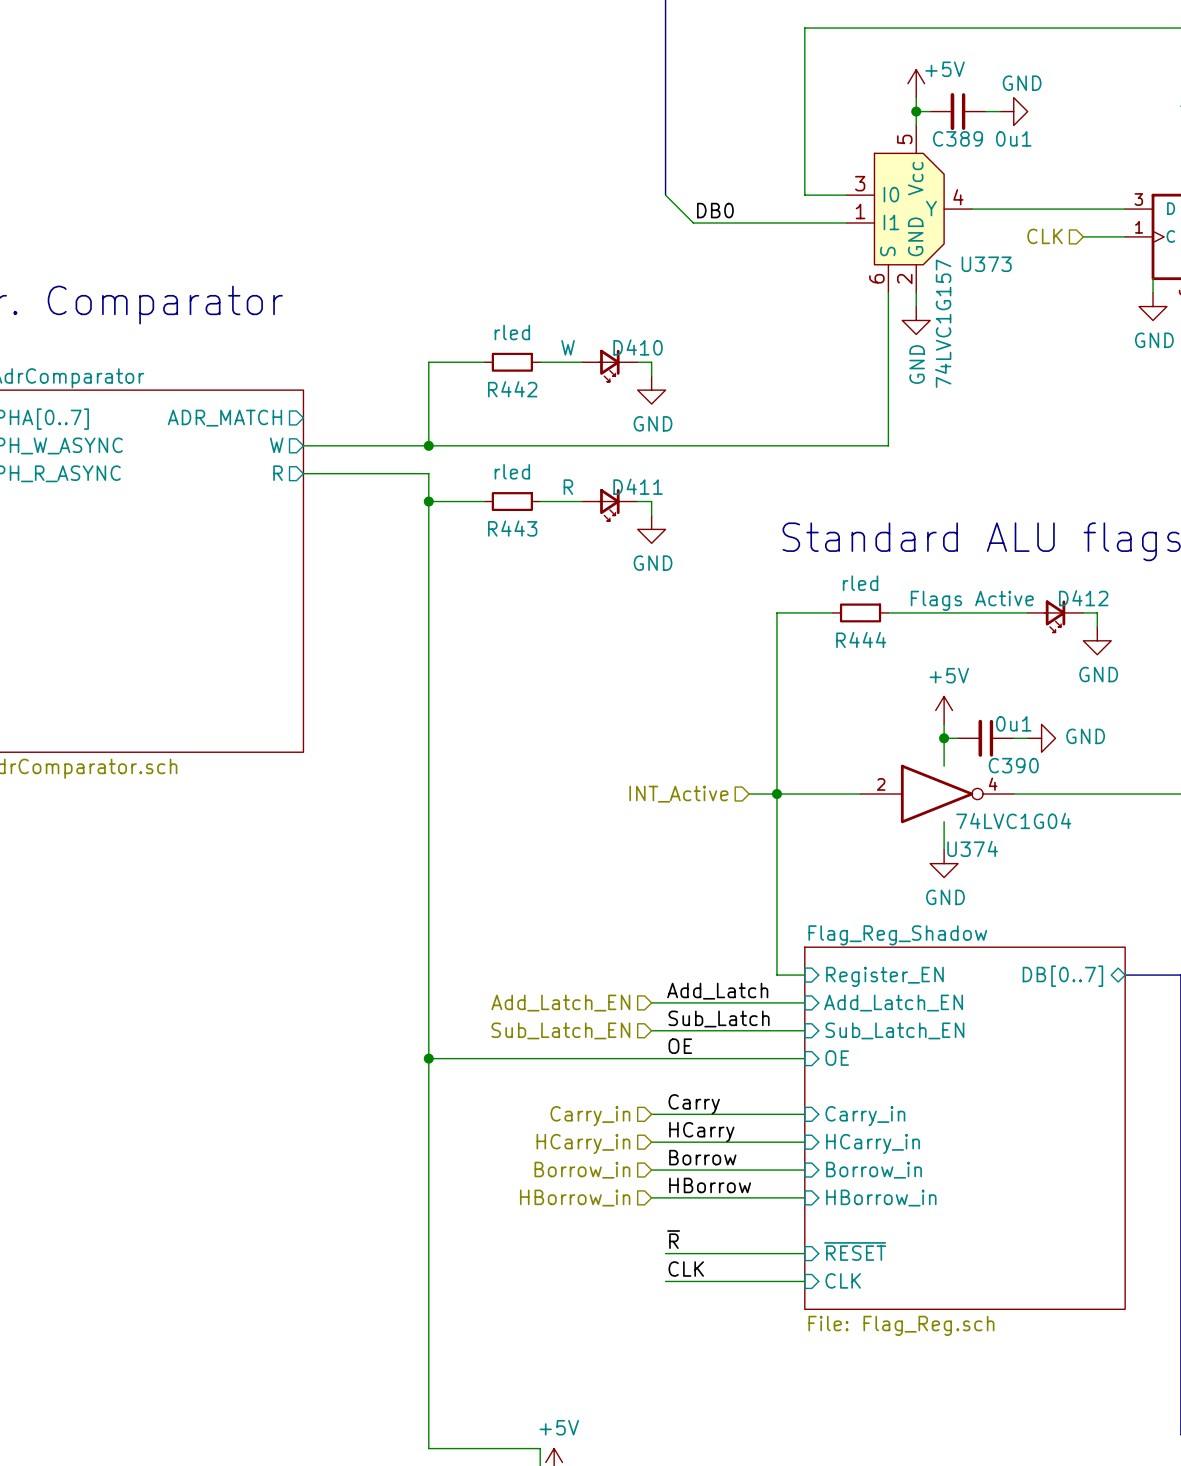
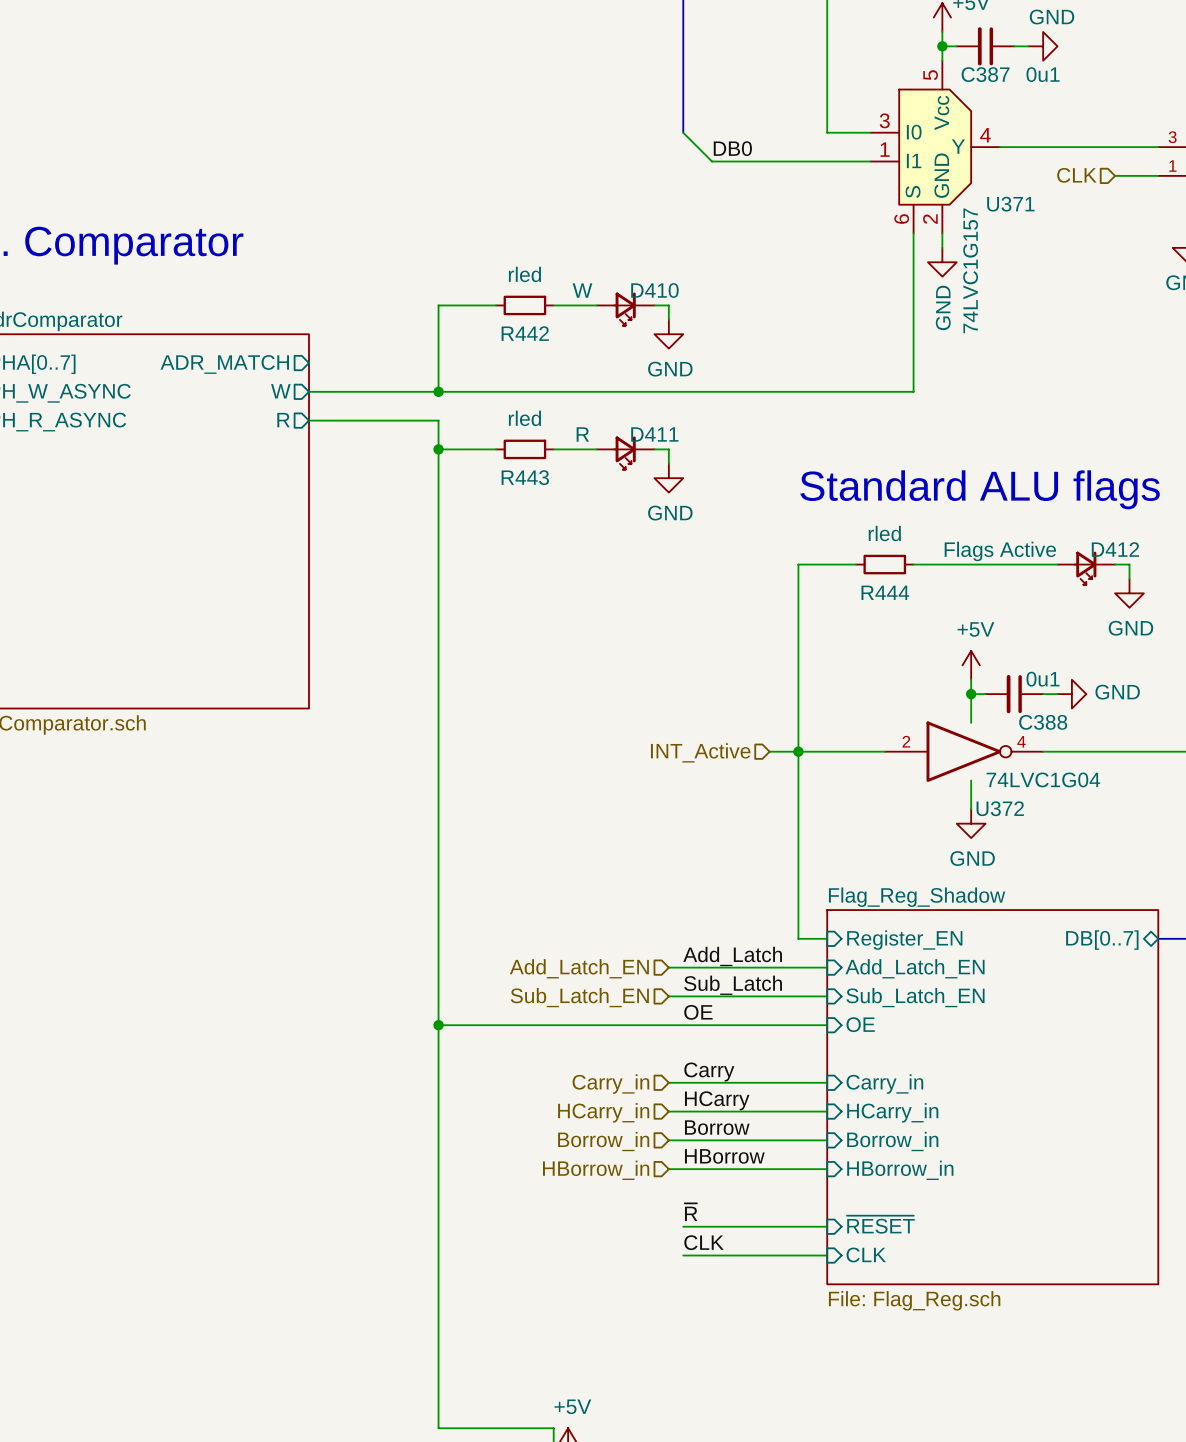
C389 name: C389 (958, 138) -> C387 (985, 74)
U373 name: U373 (986, 264) -> U371 (1010, 204)
C390 name: C390 (1013, 765) -> C388 (1043, 722)
U374 name: U374 (972, 848) -> U372 (1000, 808)

